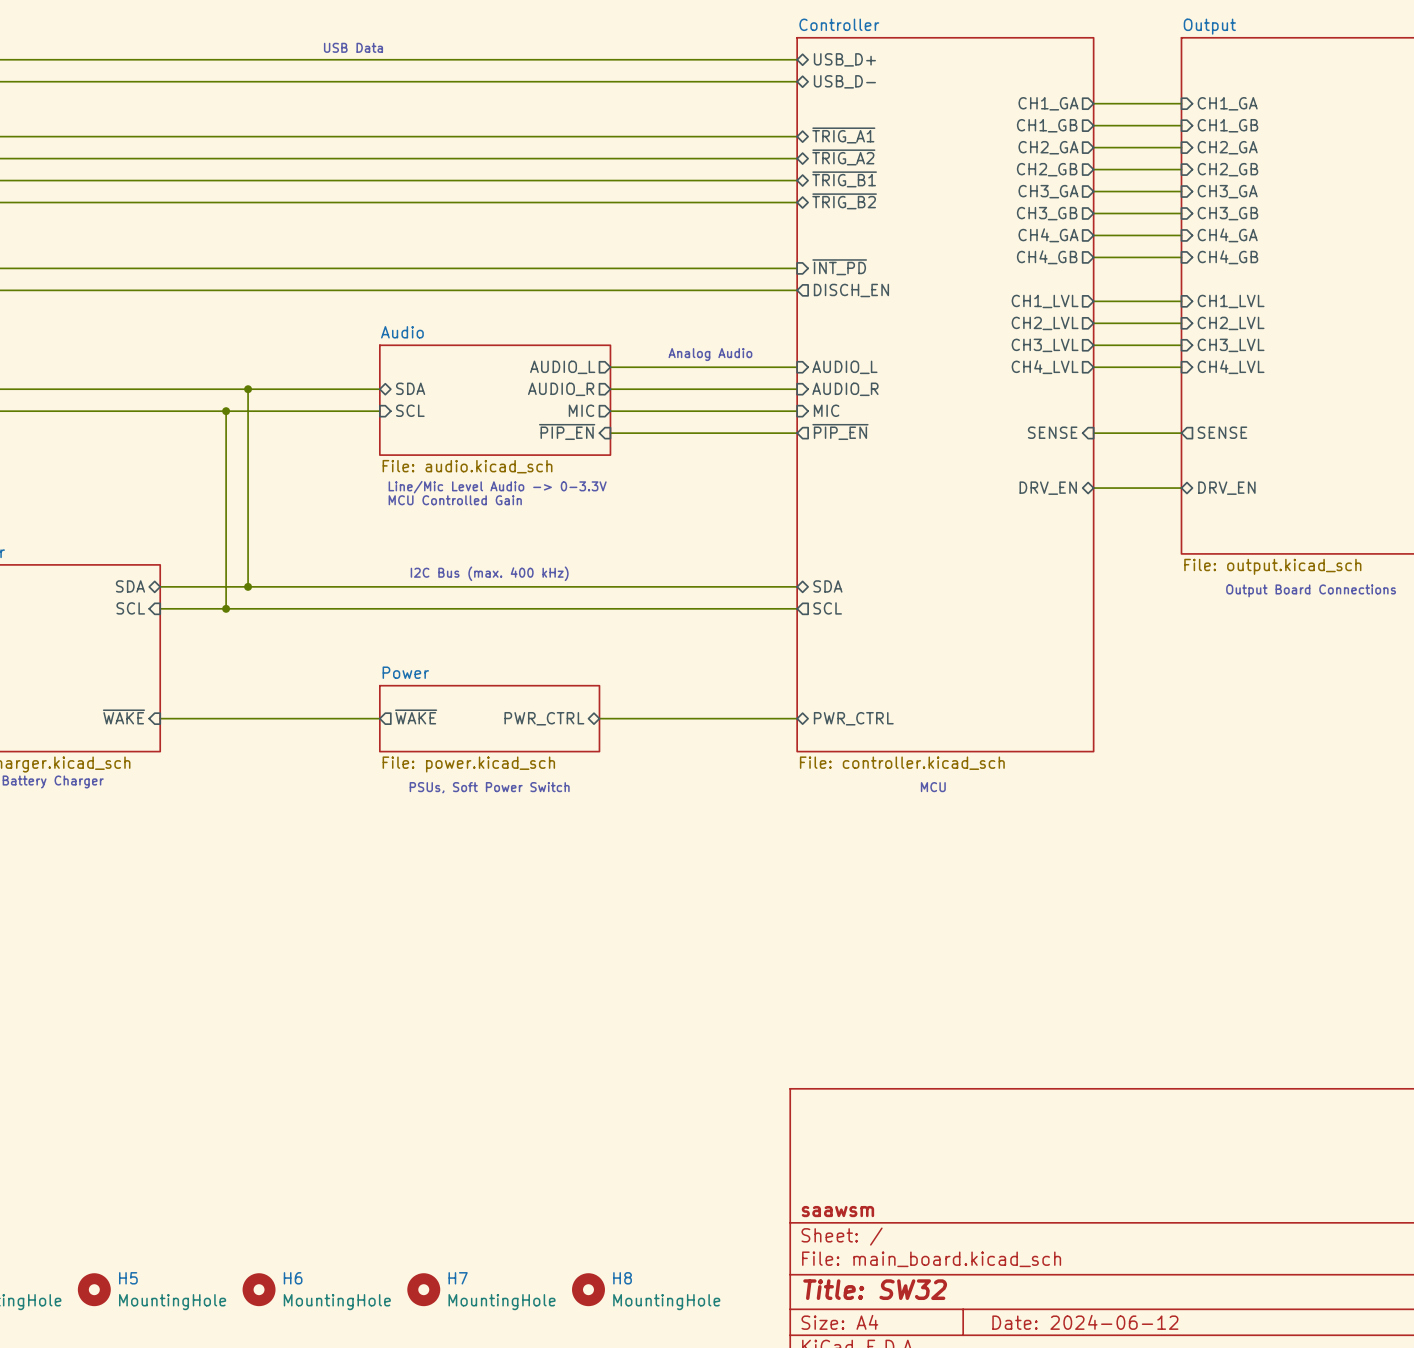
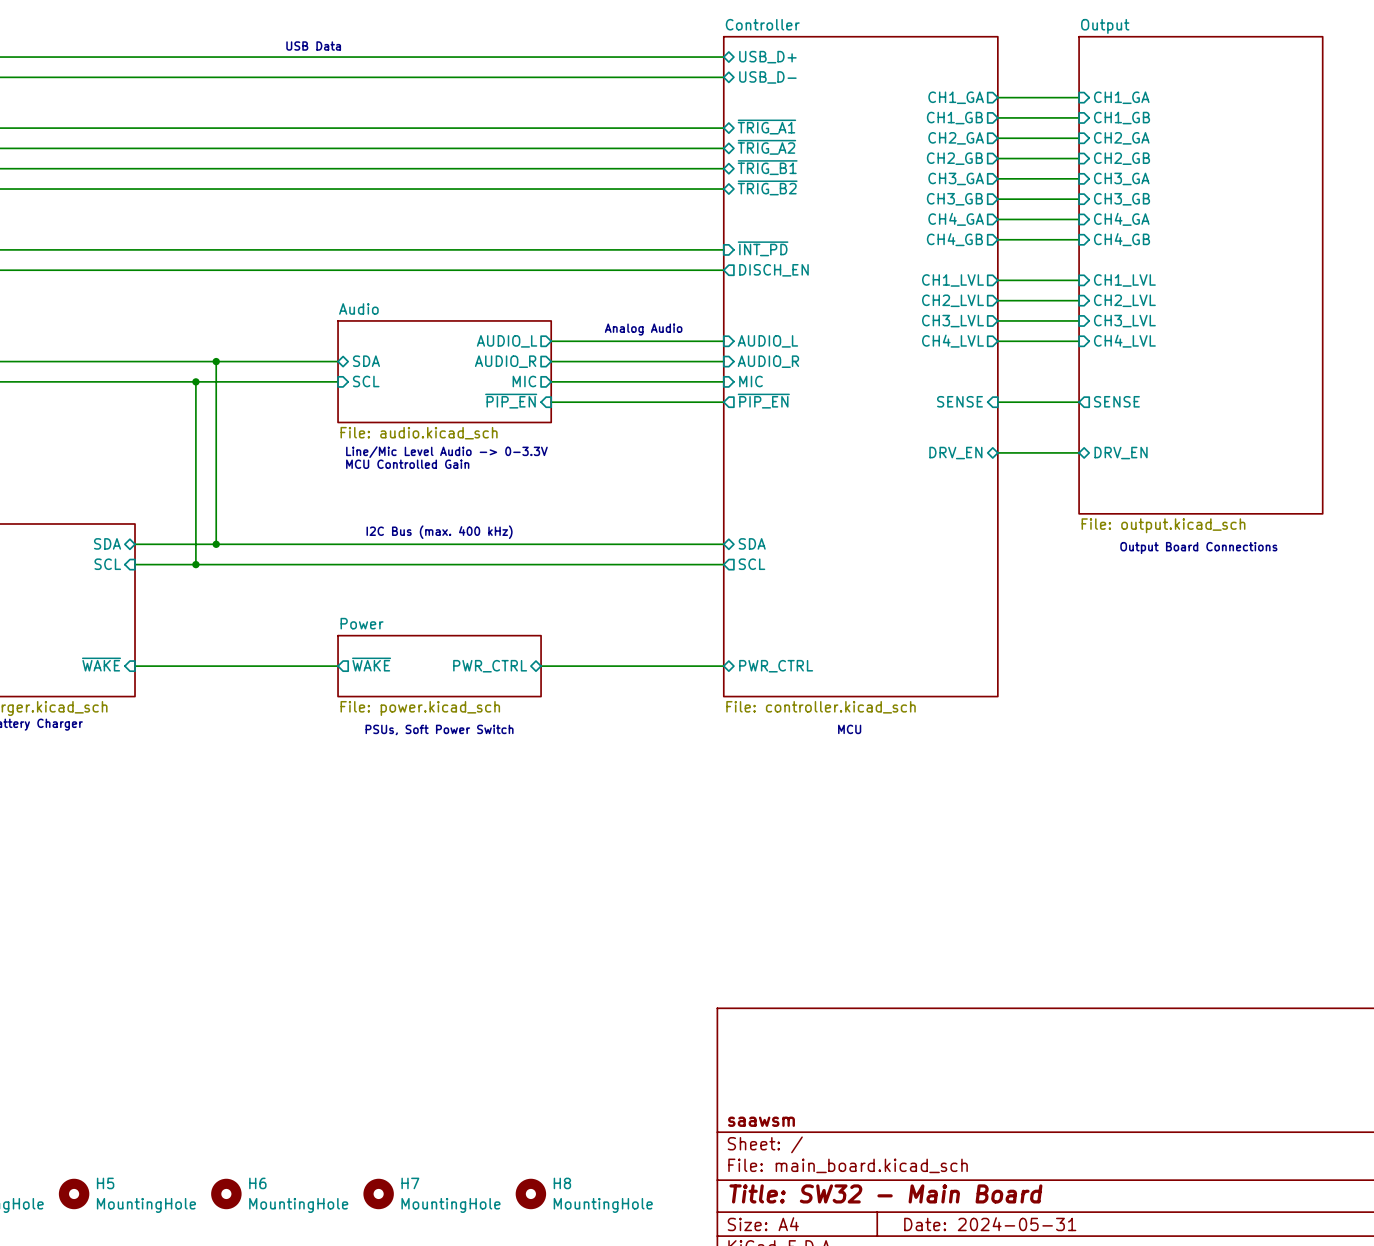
title block: Title: SW32 (875, 1289) -> Title: SW32 - Main Board (885, 1193)
title block: Date: 2024-06-12 (1085, 1322) -> Date: 2024-05-31 (990, 1224)

